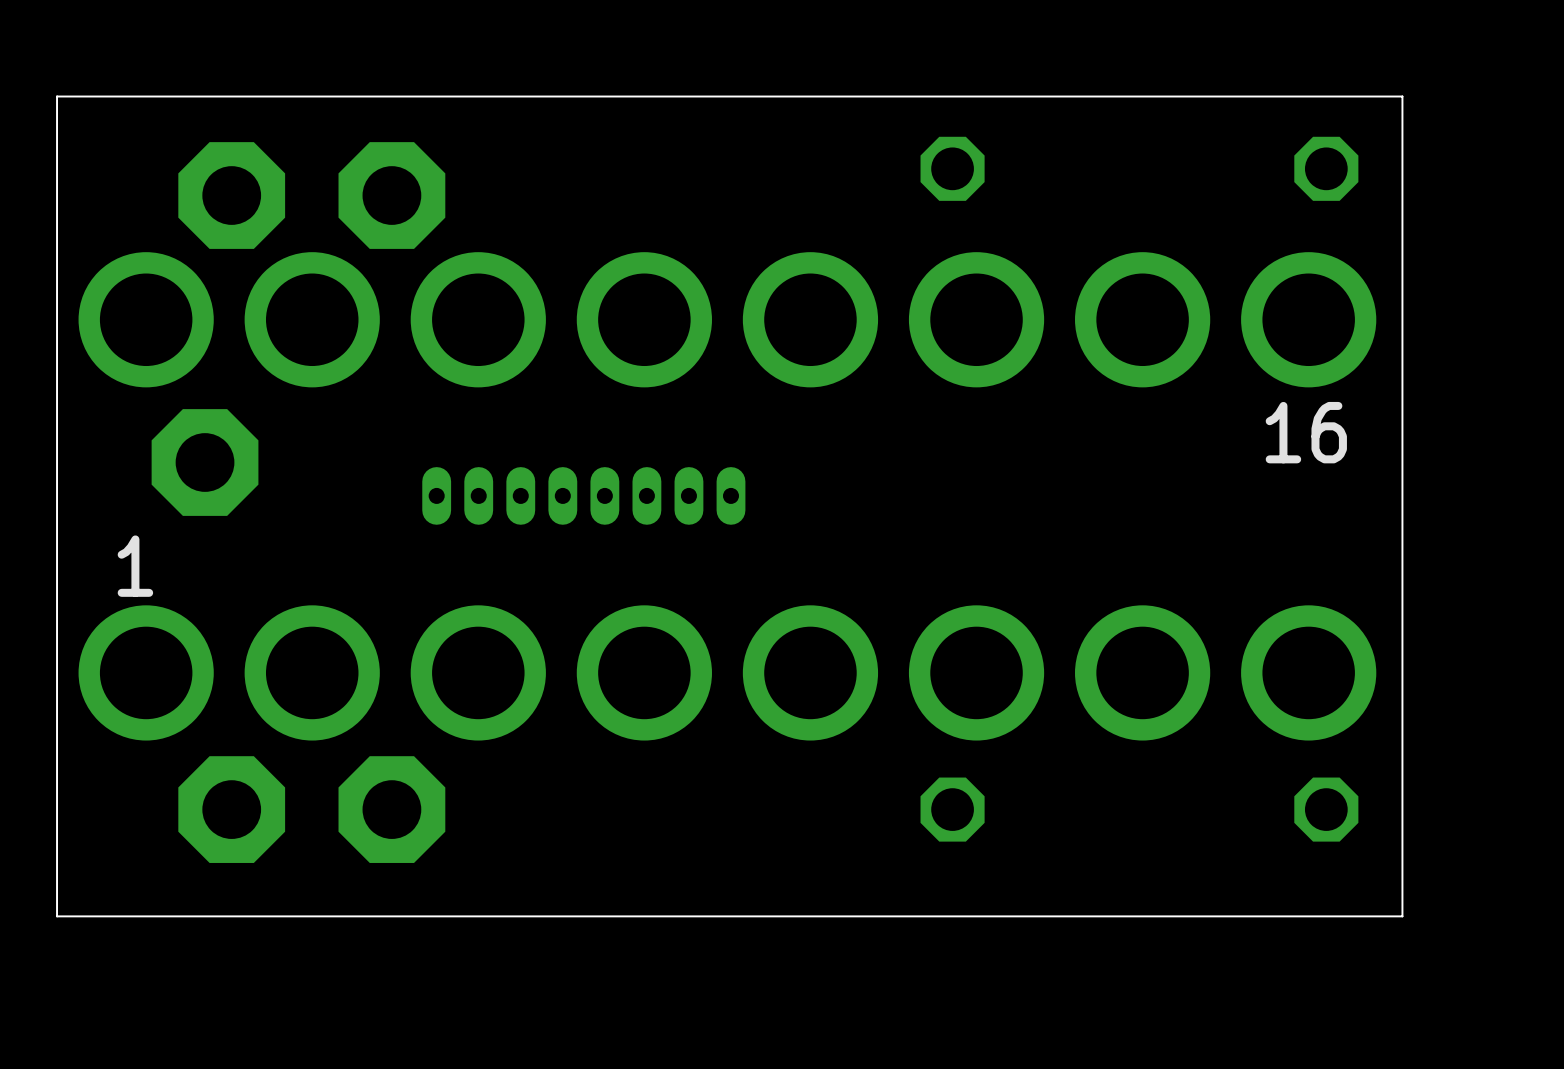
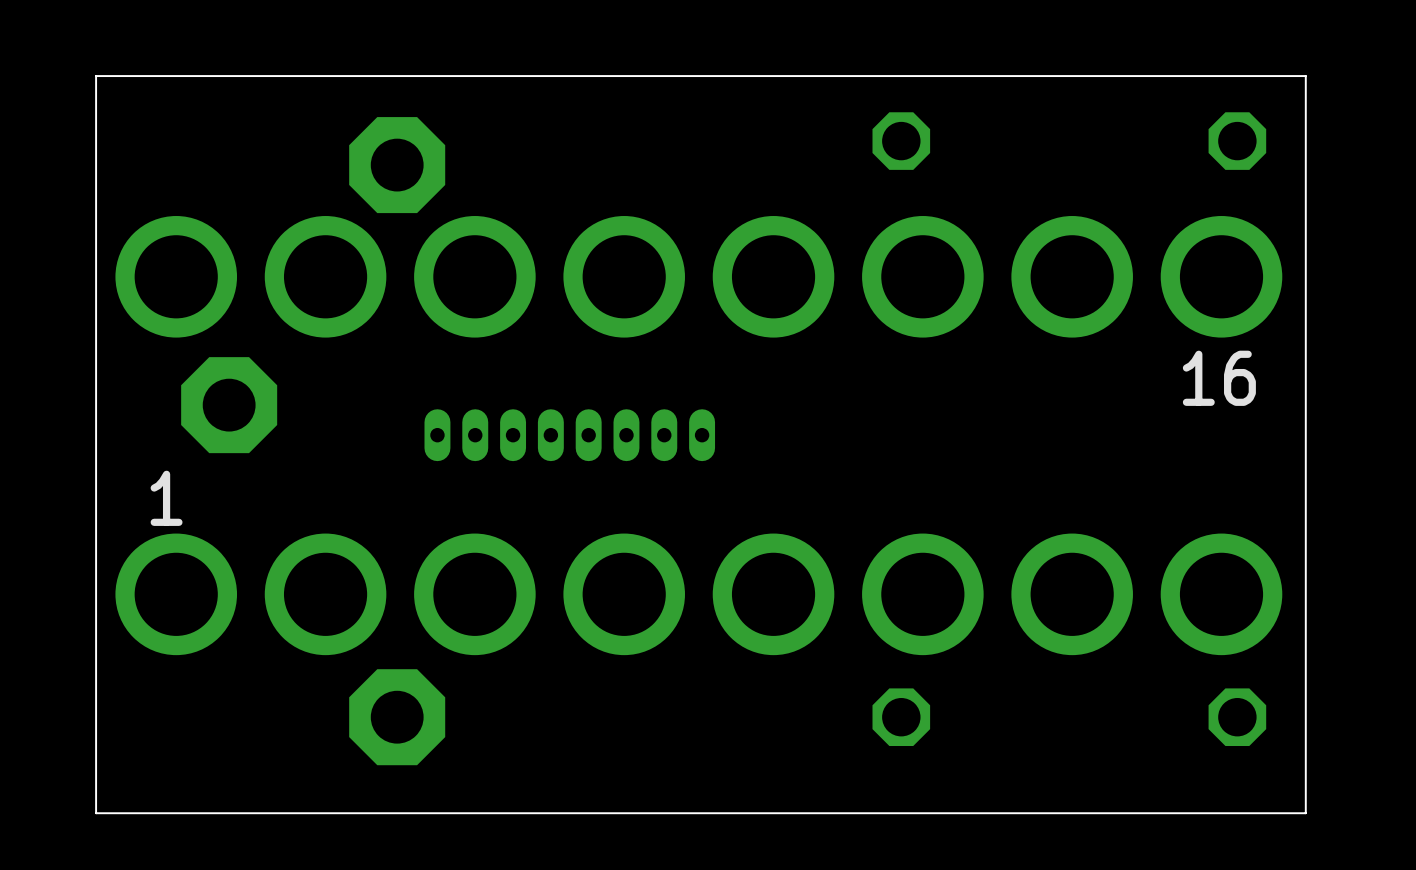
part: (231, 195) -> none
part: (231, 809) -> none

